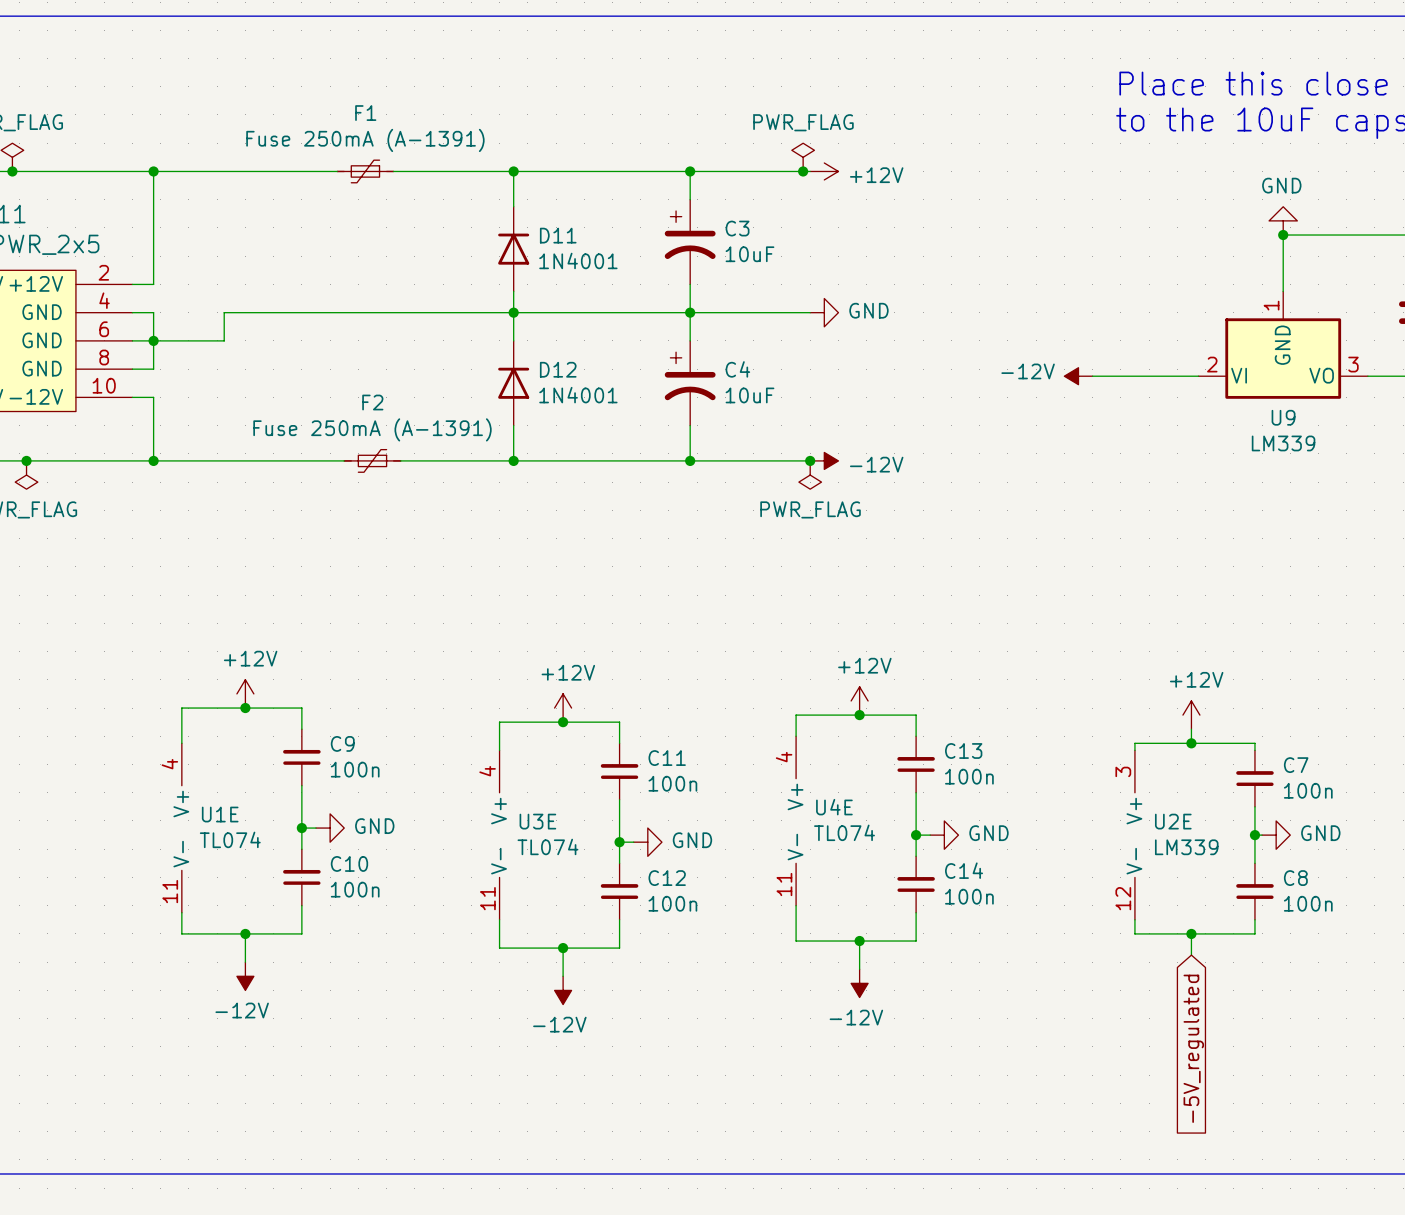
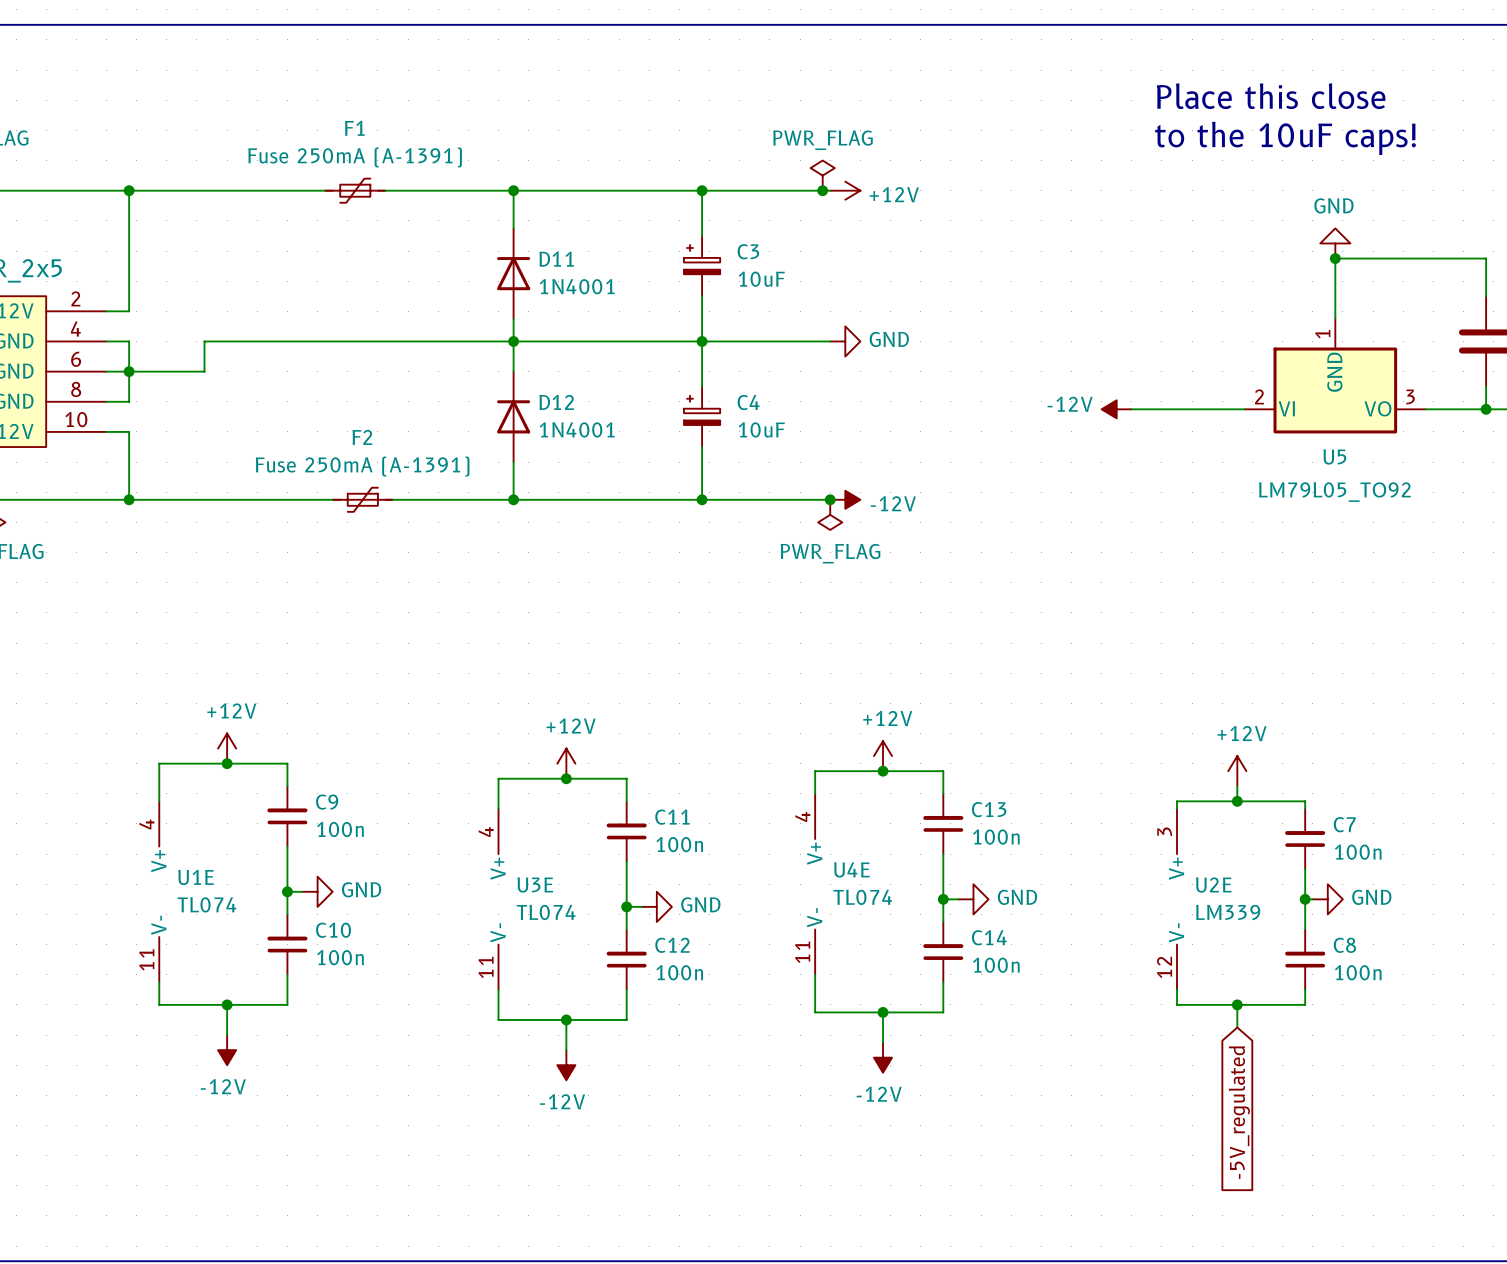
C3 symbol: [664, 199, 716, 285] -> [683, 235, 721, 297]
C4 symbol: [664, 340, 716, 426] -> [683, 386, 721, 448]
U9 name: U9 (1283, 417) -> U5 (1334, 456)
U9 value: LM339 (1283, 443) -> LM79L05_TO92 (1334, 492)

